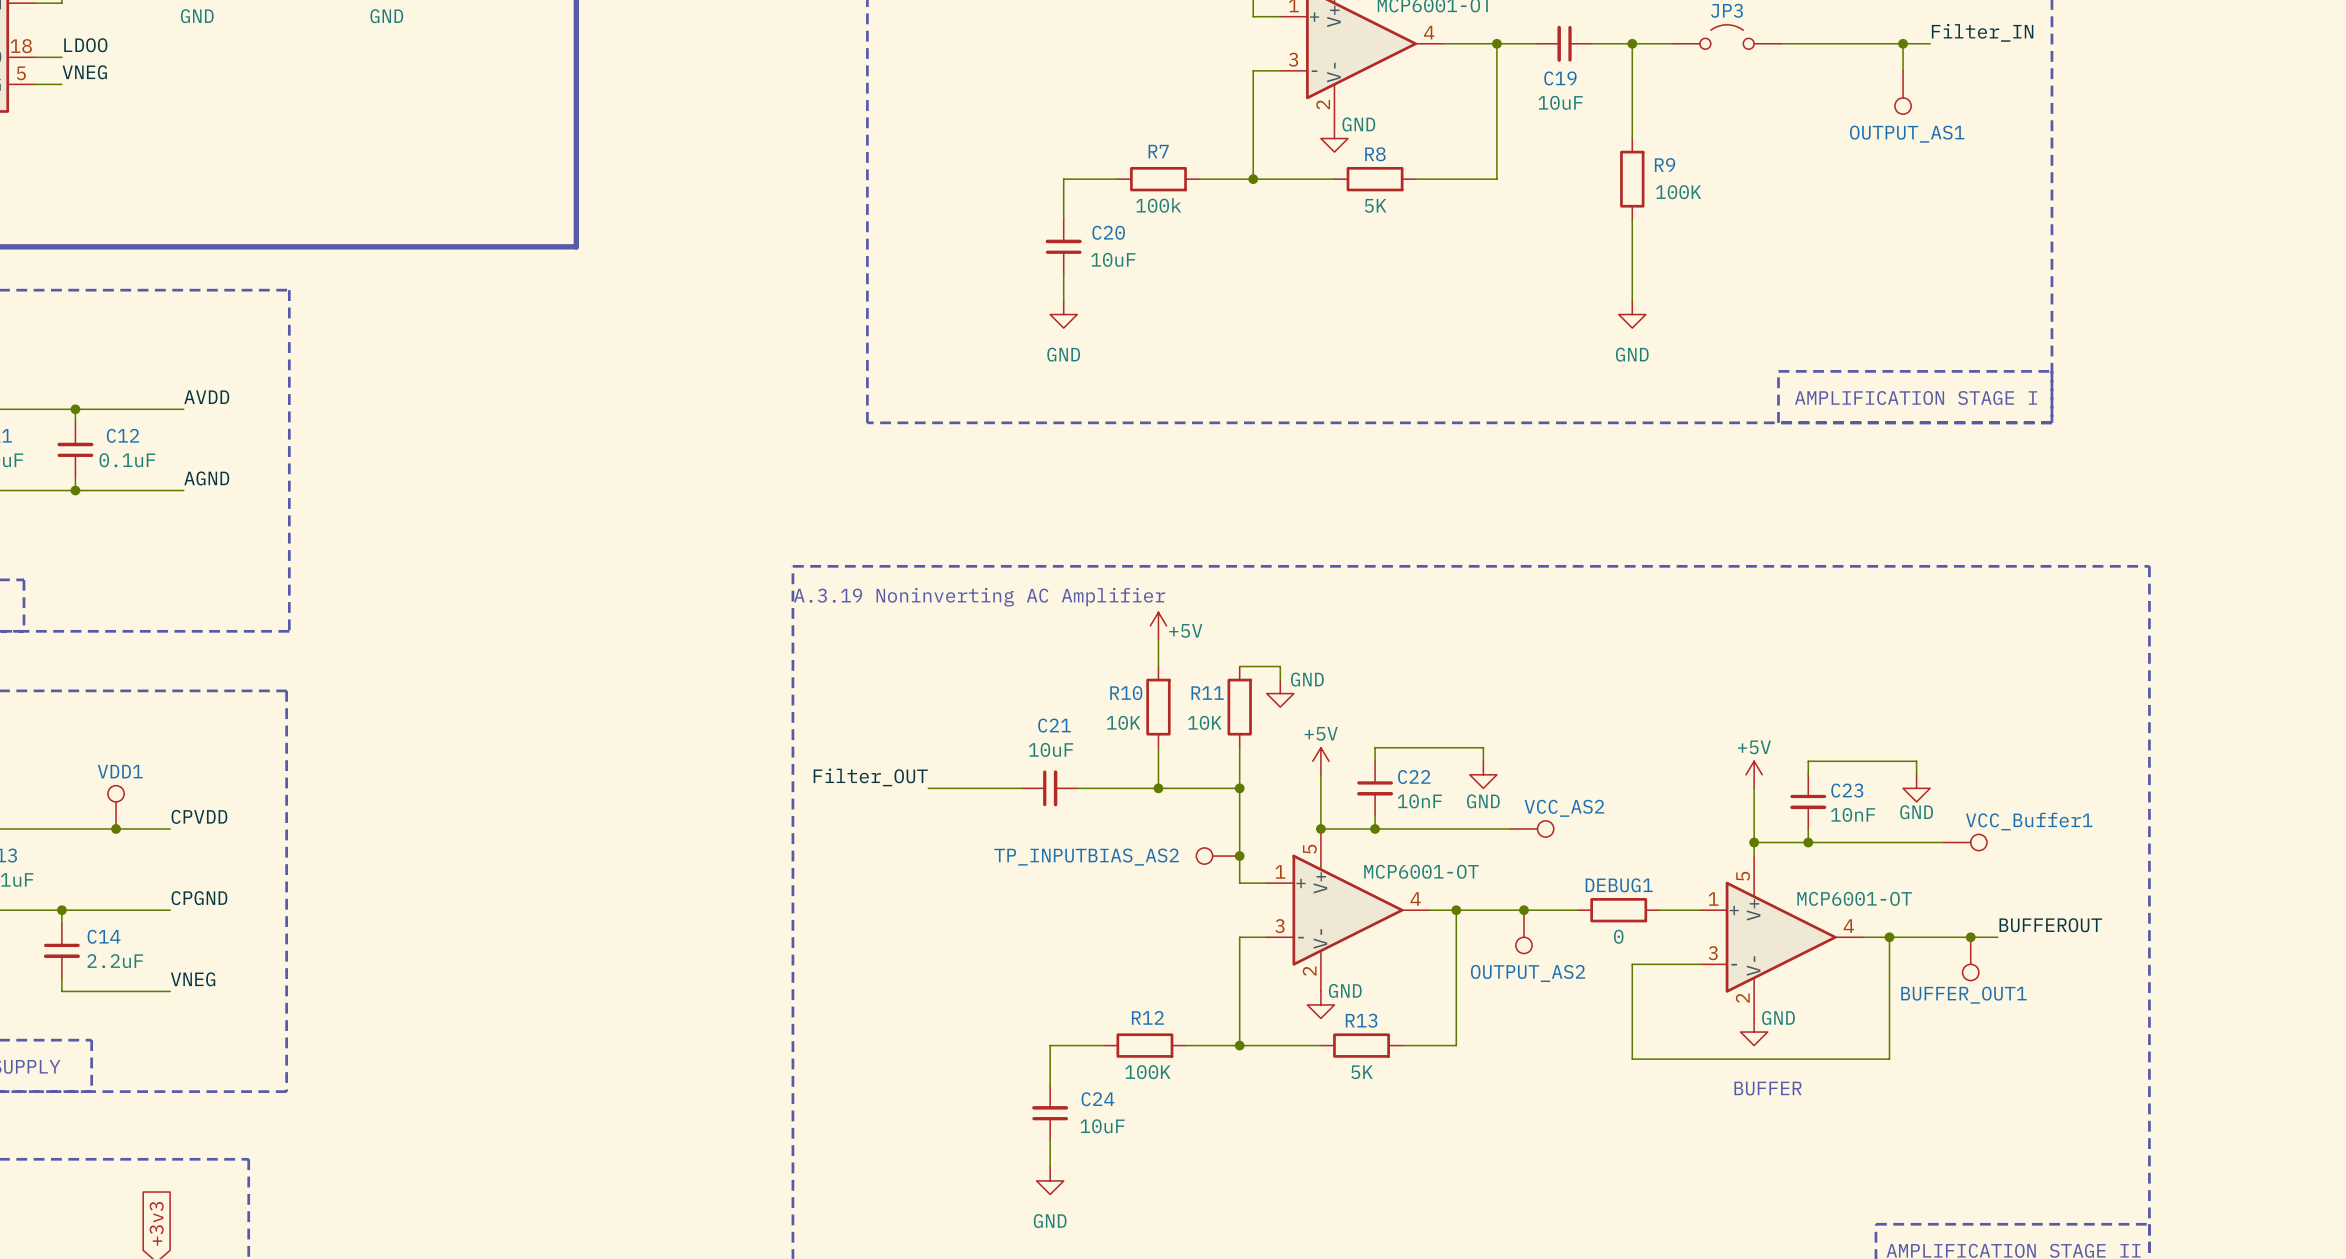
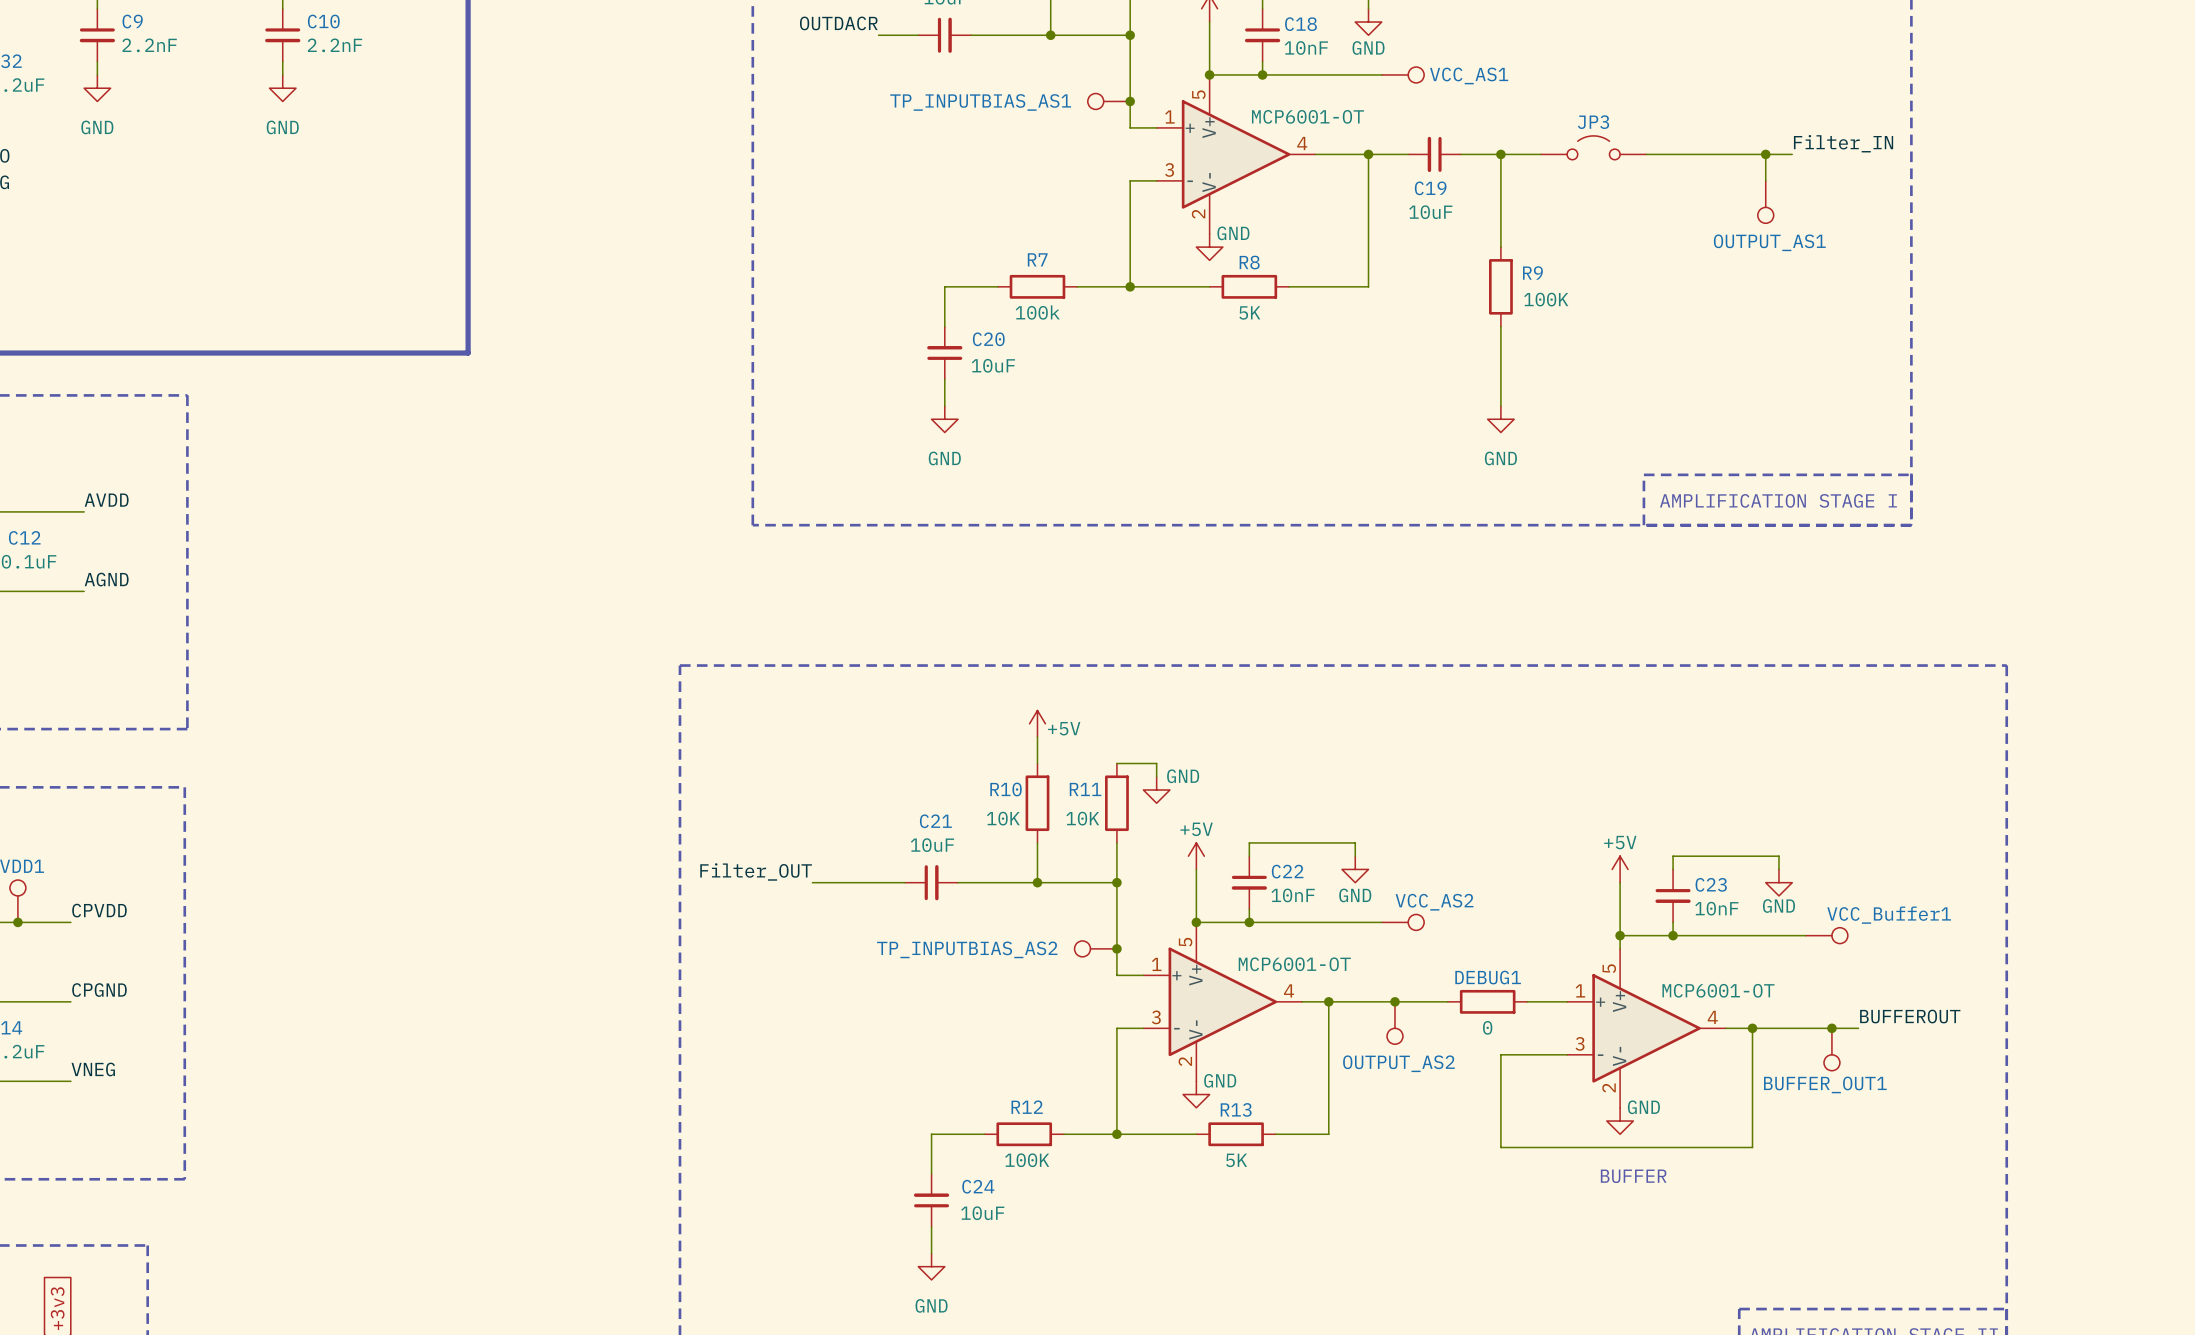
text: A.3.19 Noninverting AC Amplifier (979, 597) -> none

